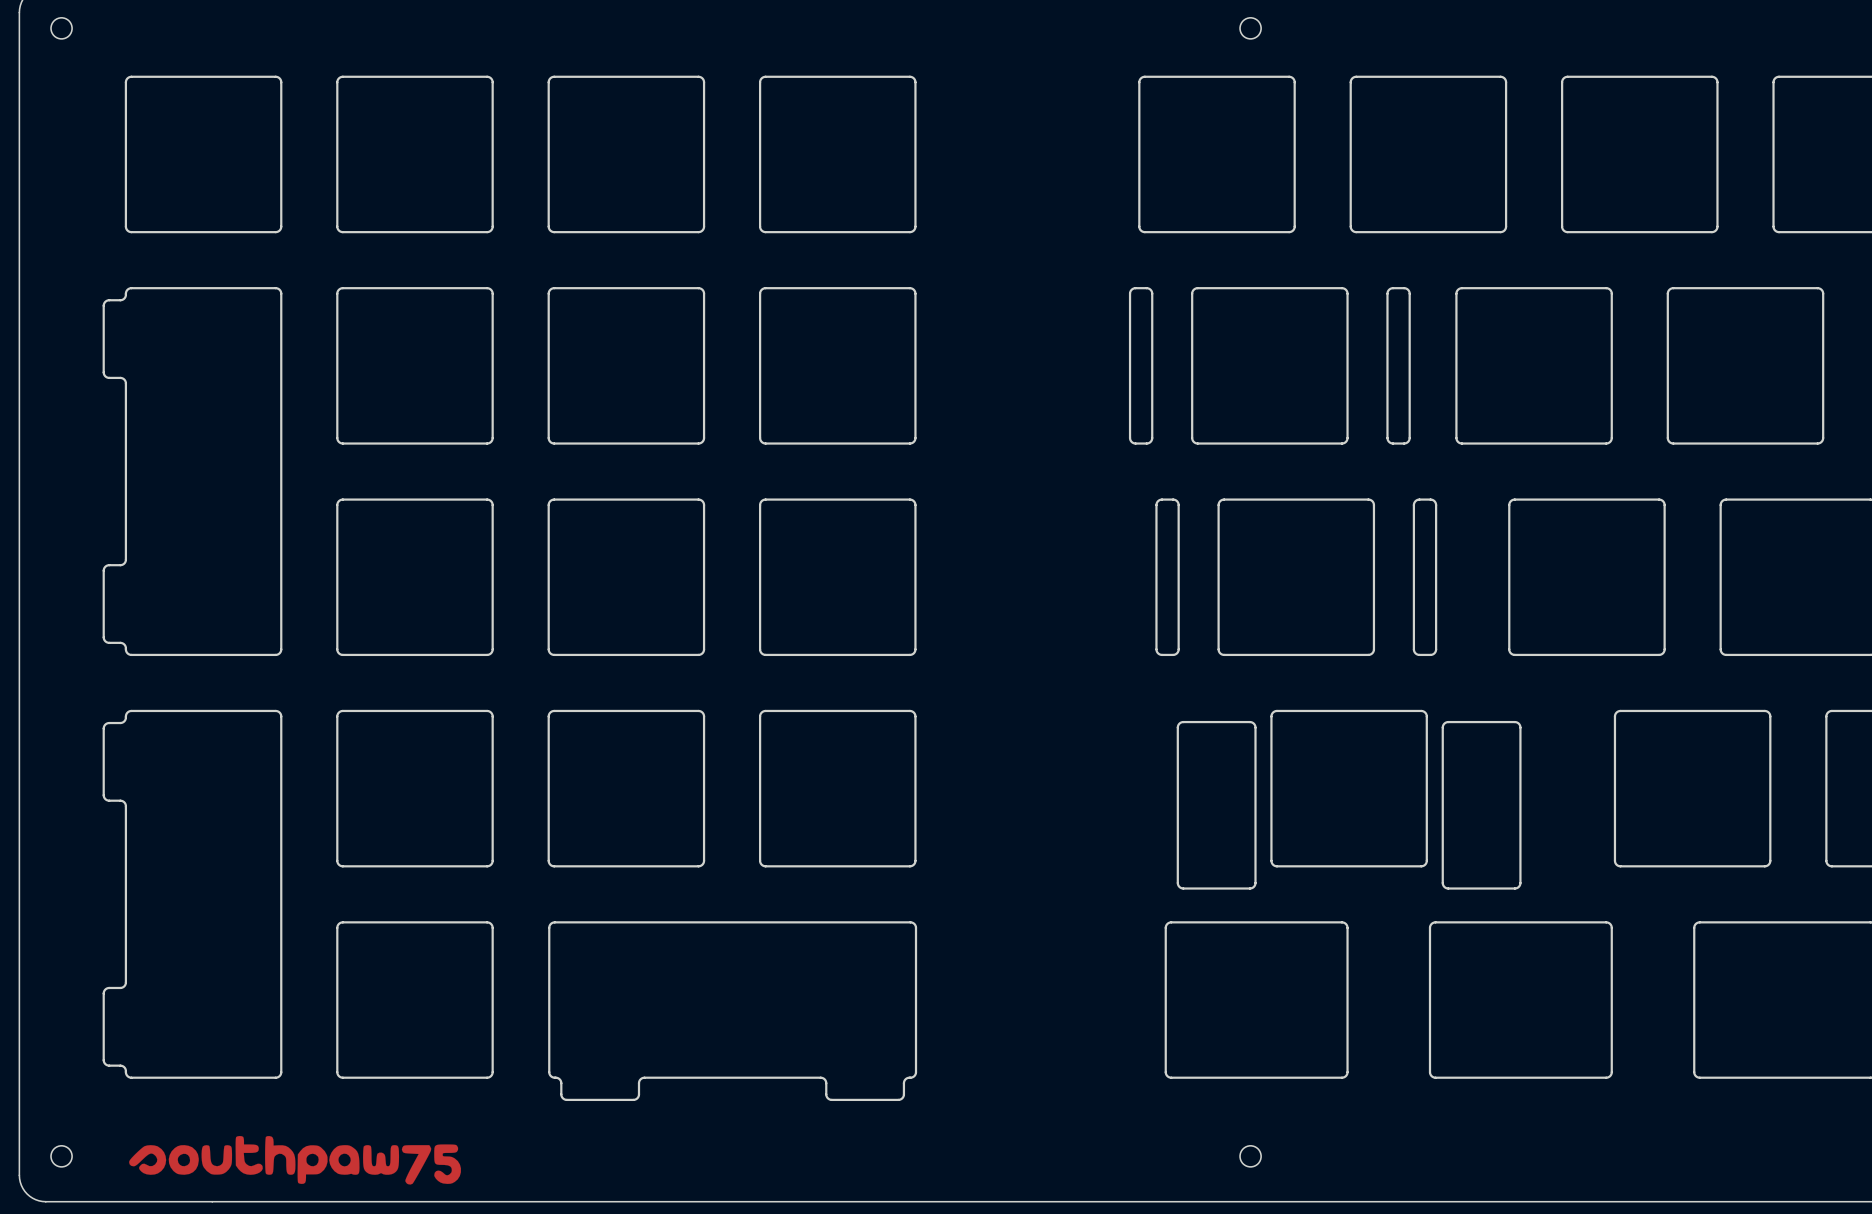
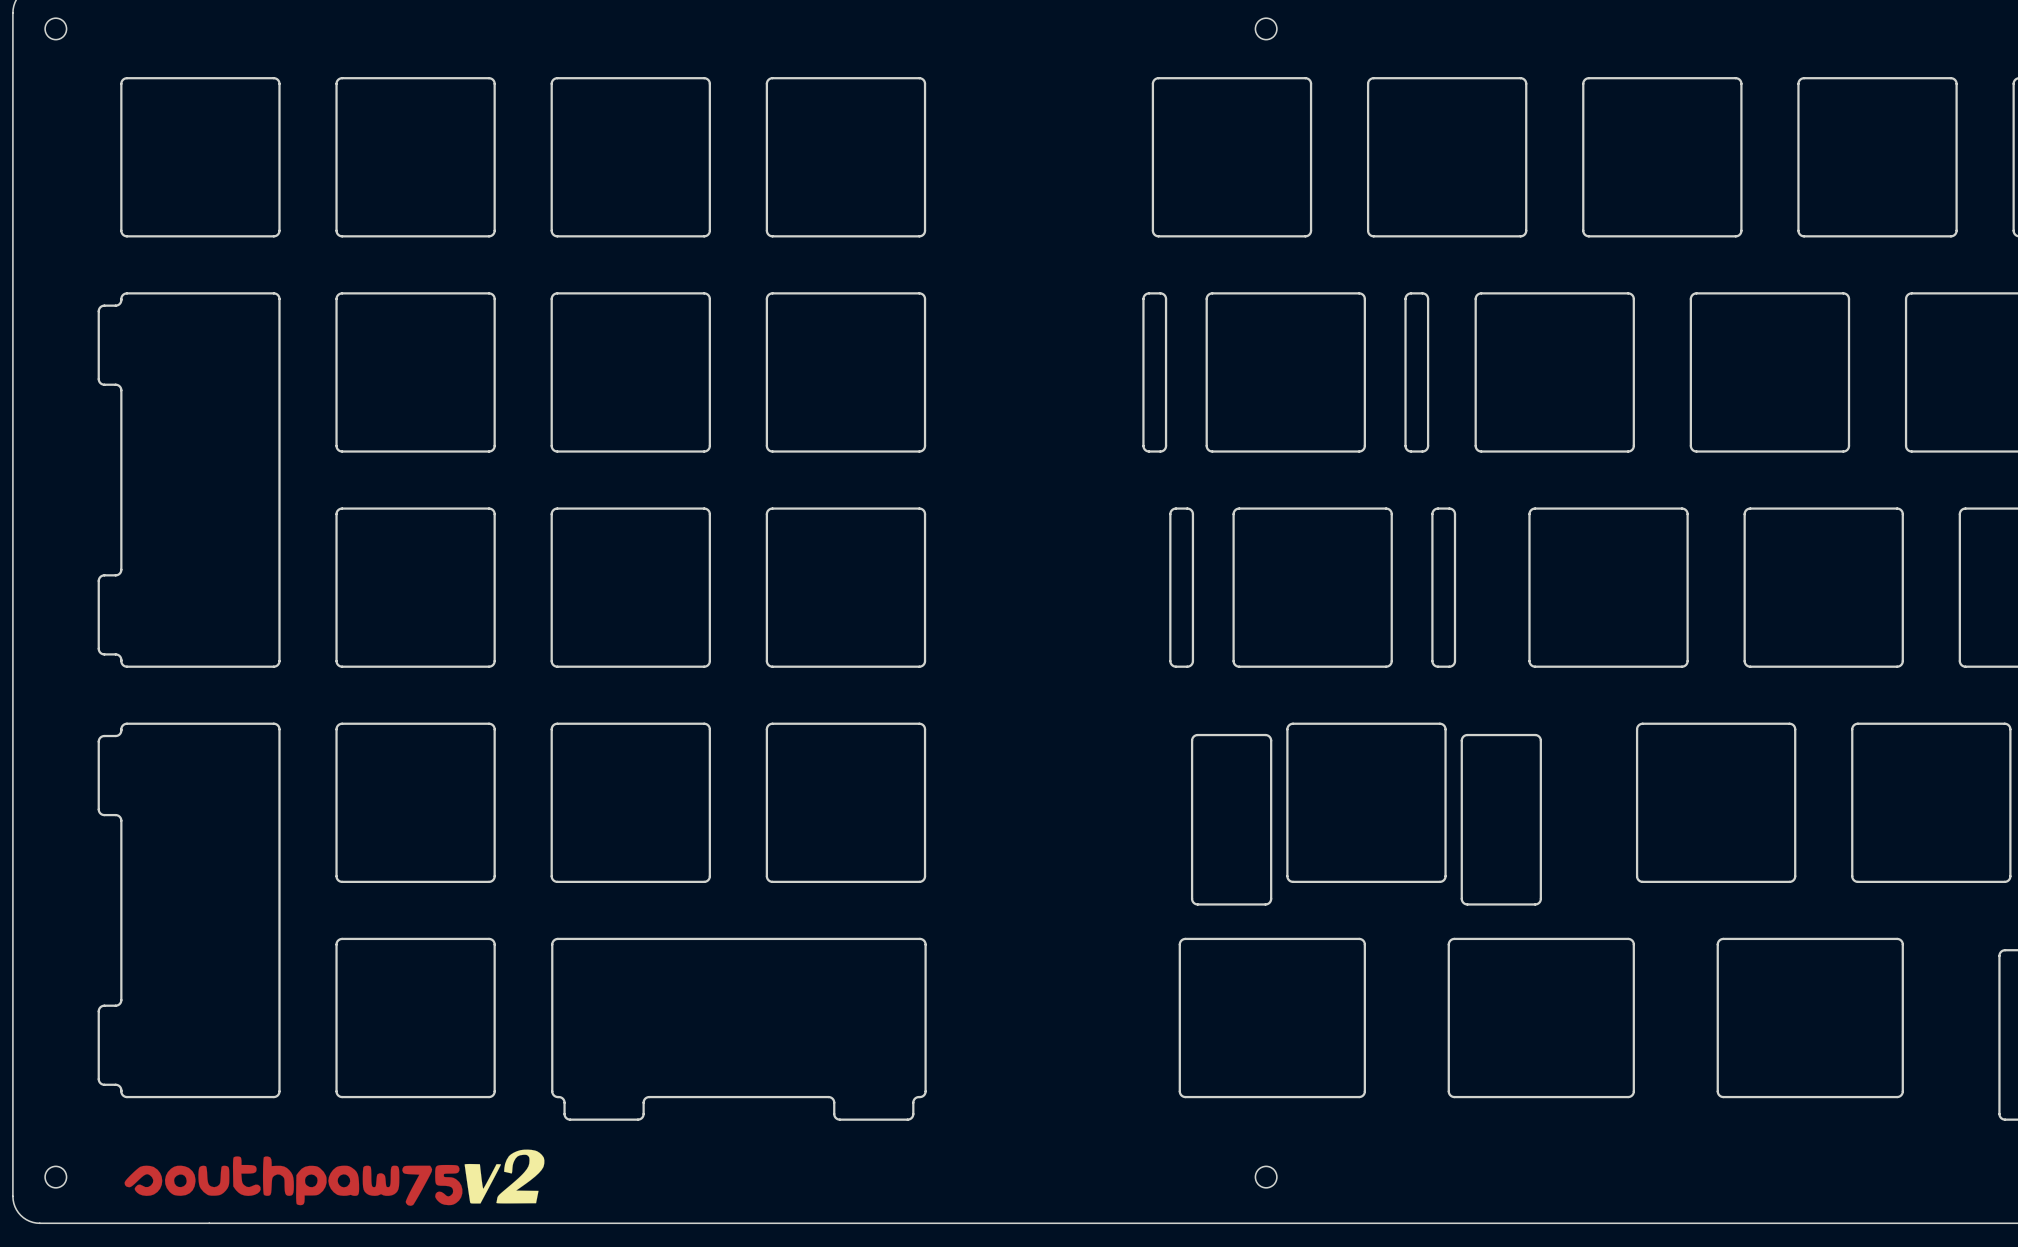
drawing: none -> [464, 1149, 545, 1204]

